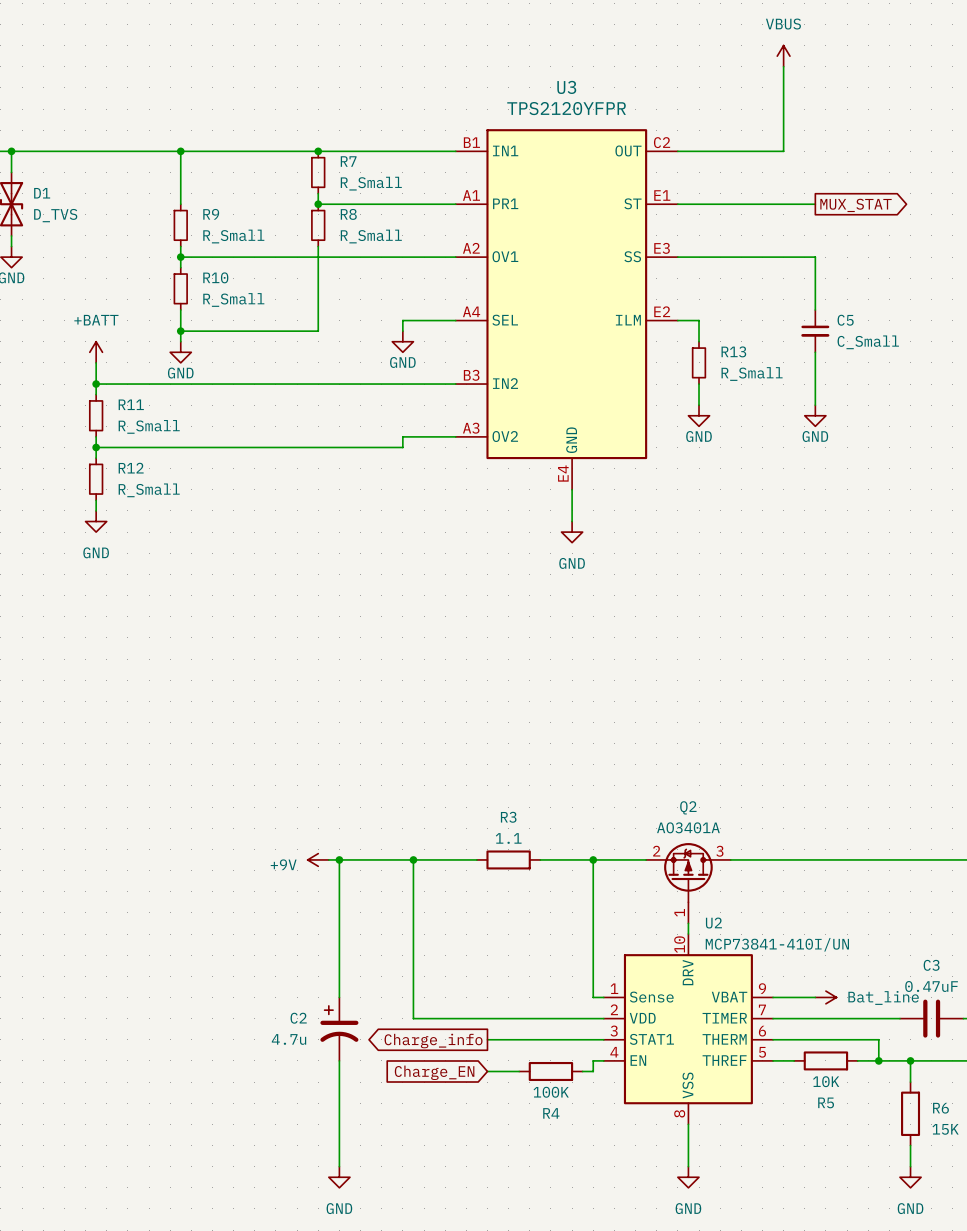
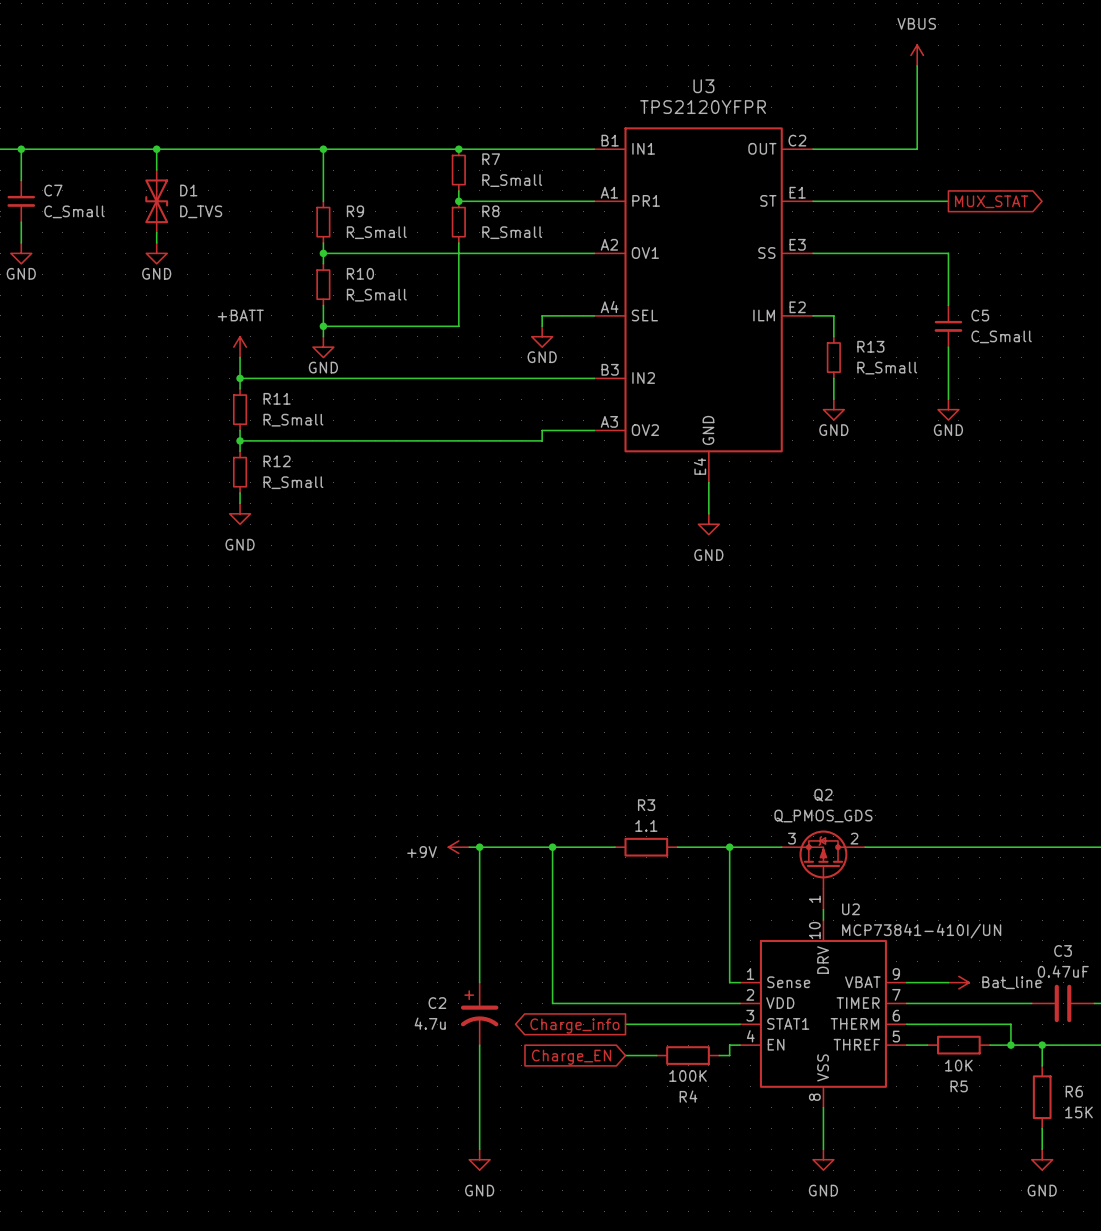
Q2 value: AO3401A (688, 827) -> Q_PMOS_GDS (823, 816)
Q2 pin number: 2 (656, 851) -> 3 (791, 838)
Q2 pin number: 3 (719, 851) -> 2 (854, 838)

